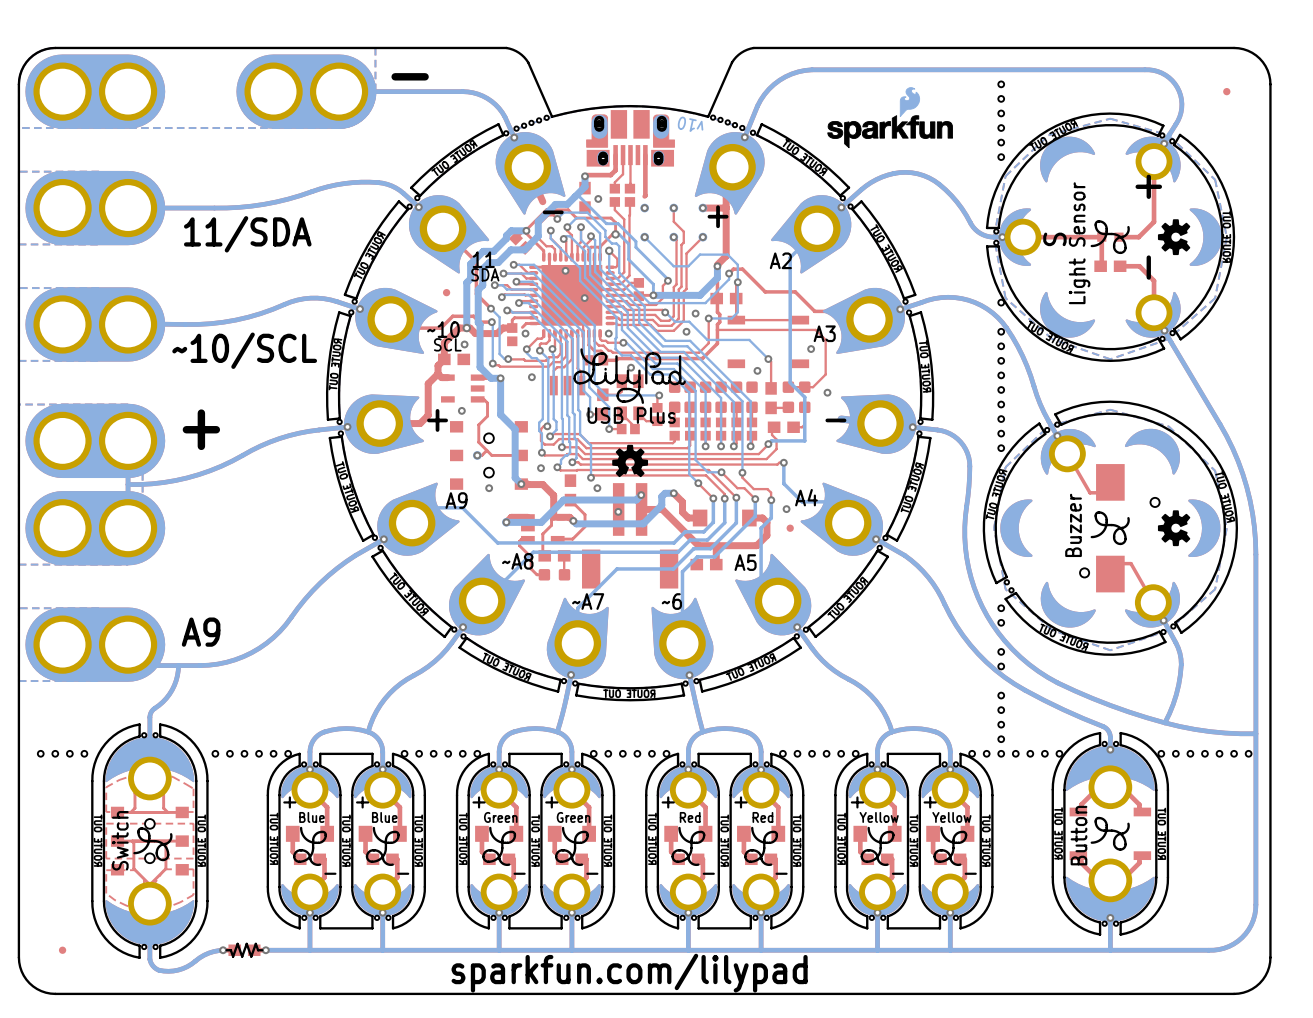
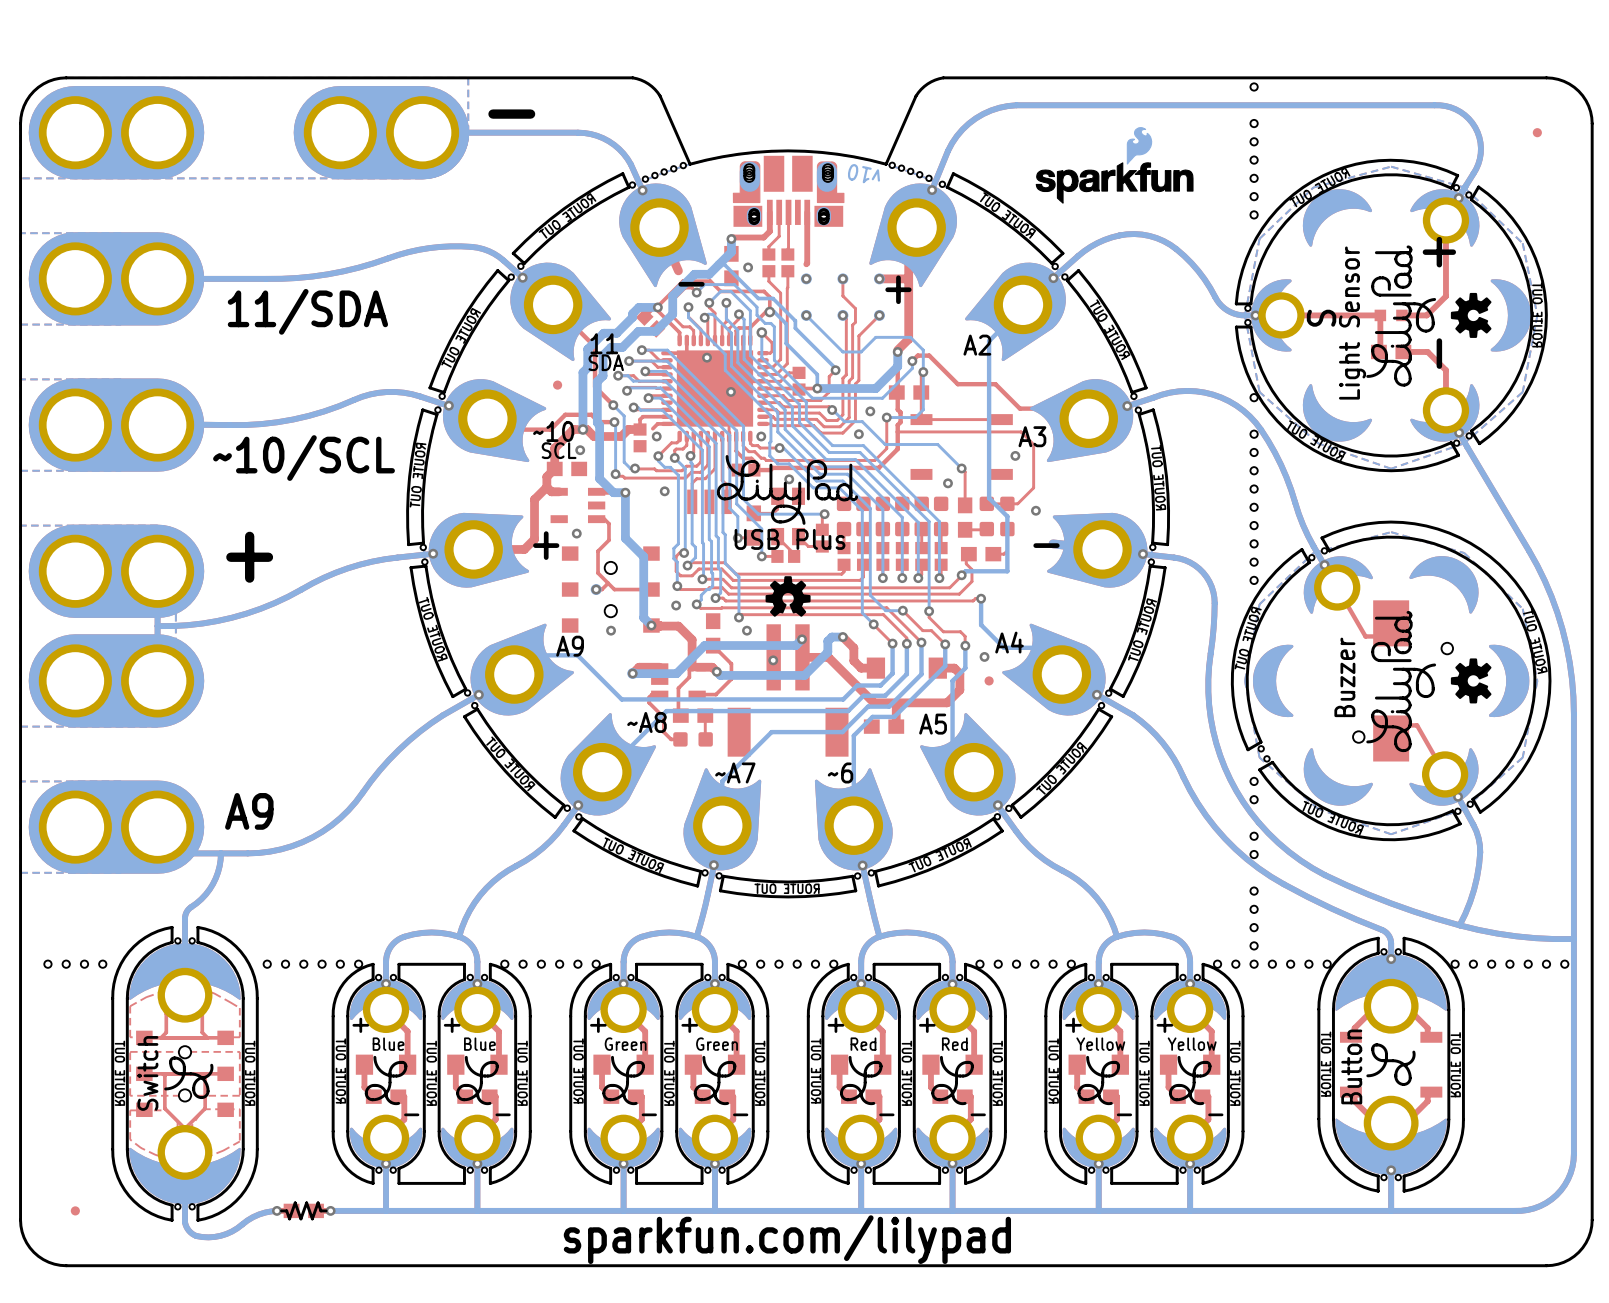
hole: none -> (1254, 86)
drawing shape: [1090, 220, 1130, 255] -> [1366, 245, 1437, 387]
drawing shape: [1090, 511, 1130, 546] -> [1366, 610, 1437, 753]

